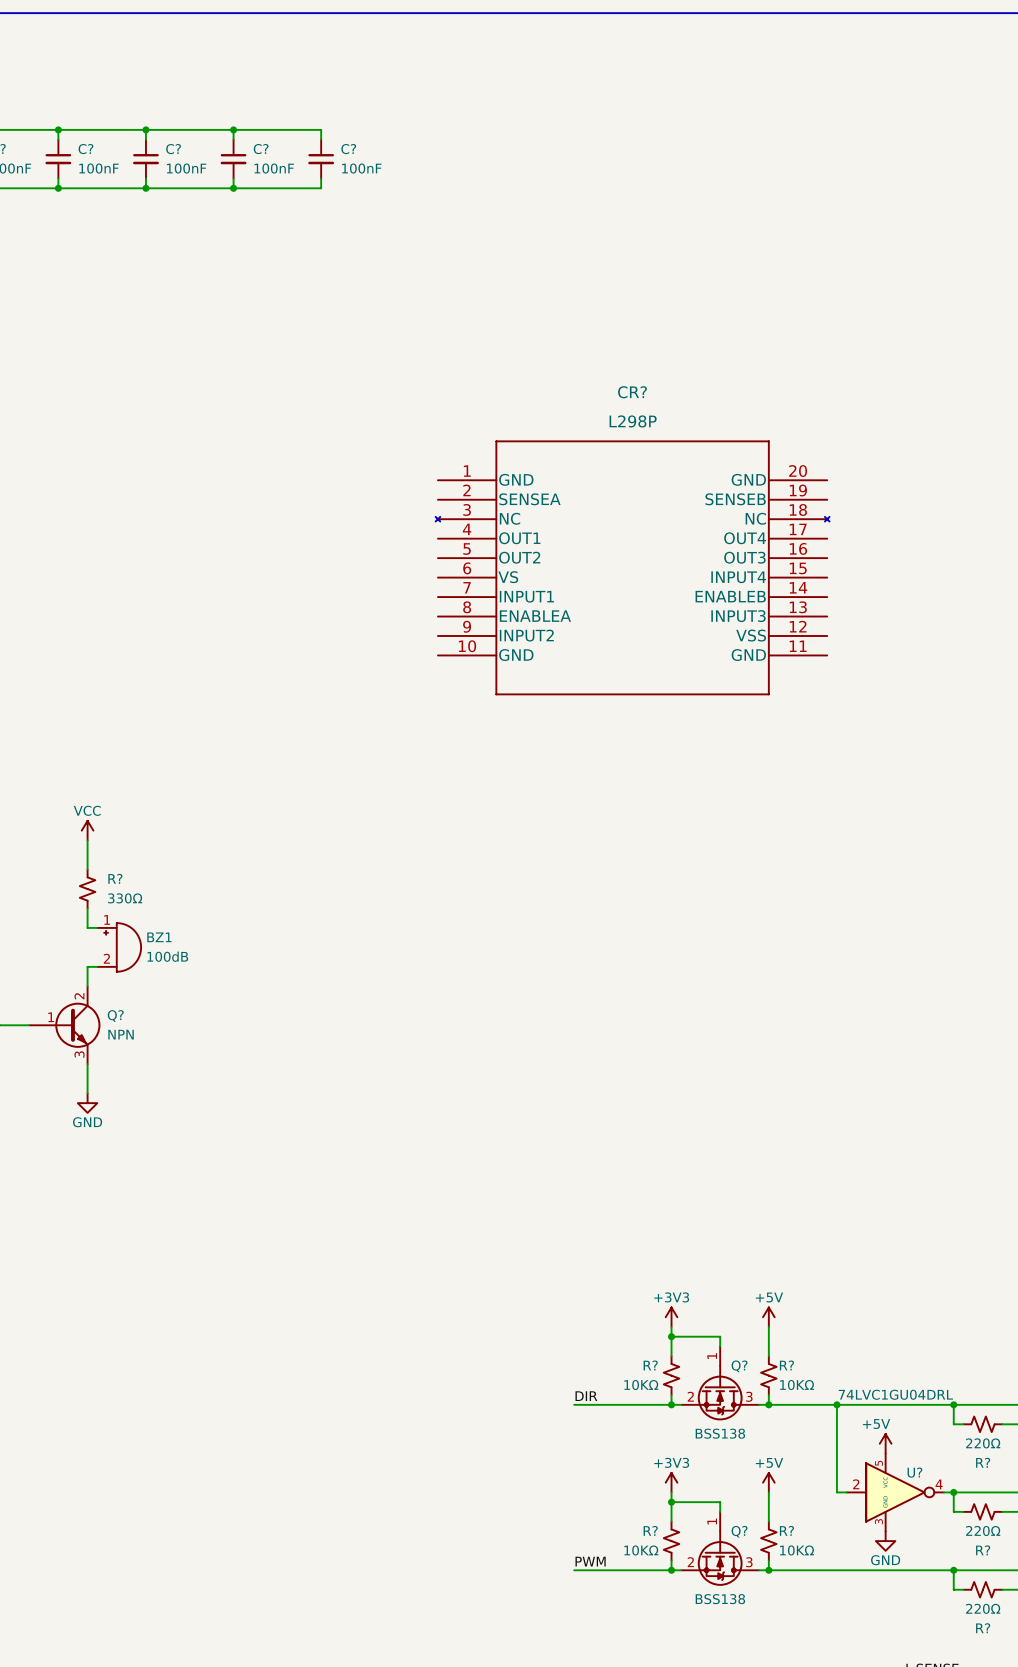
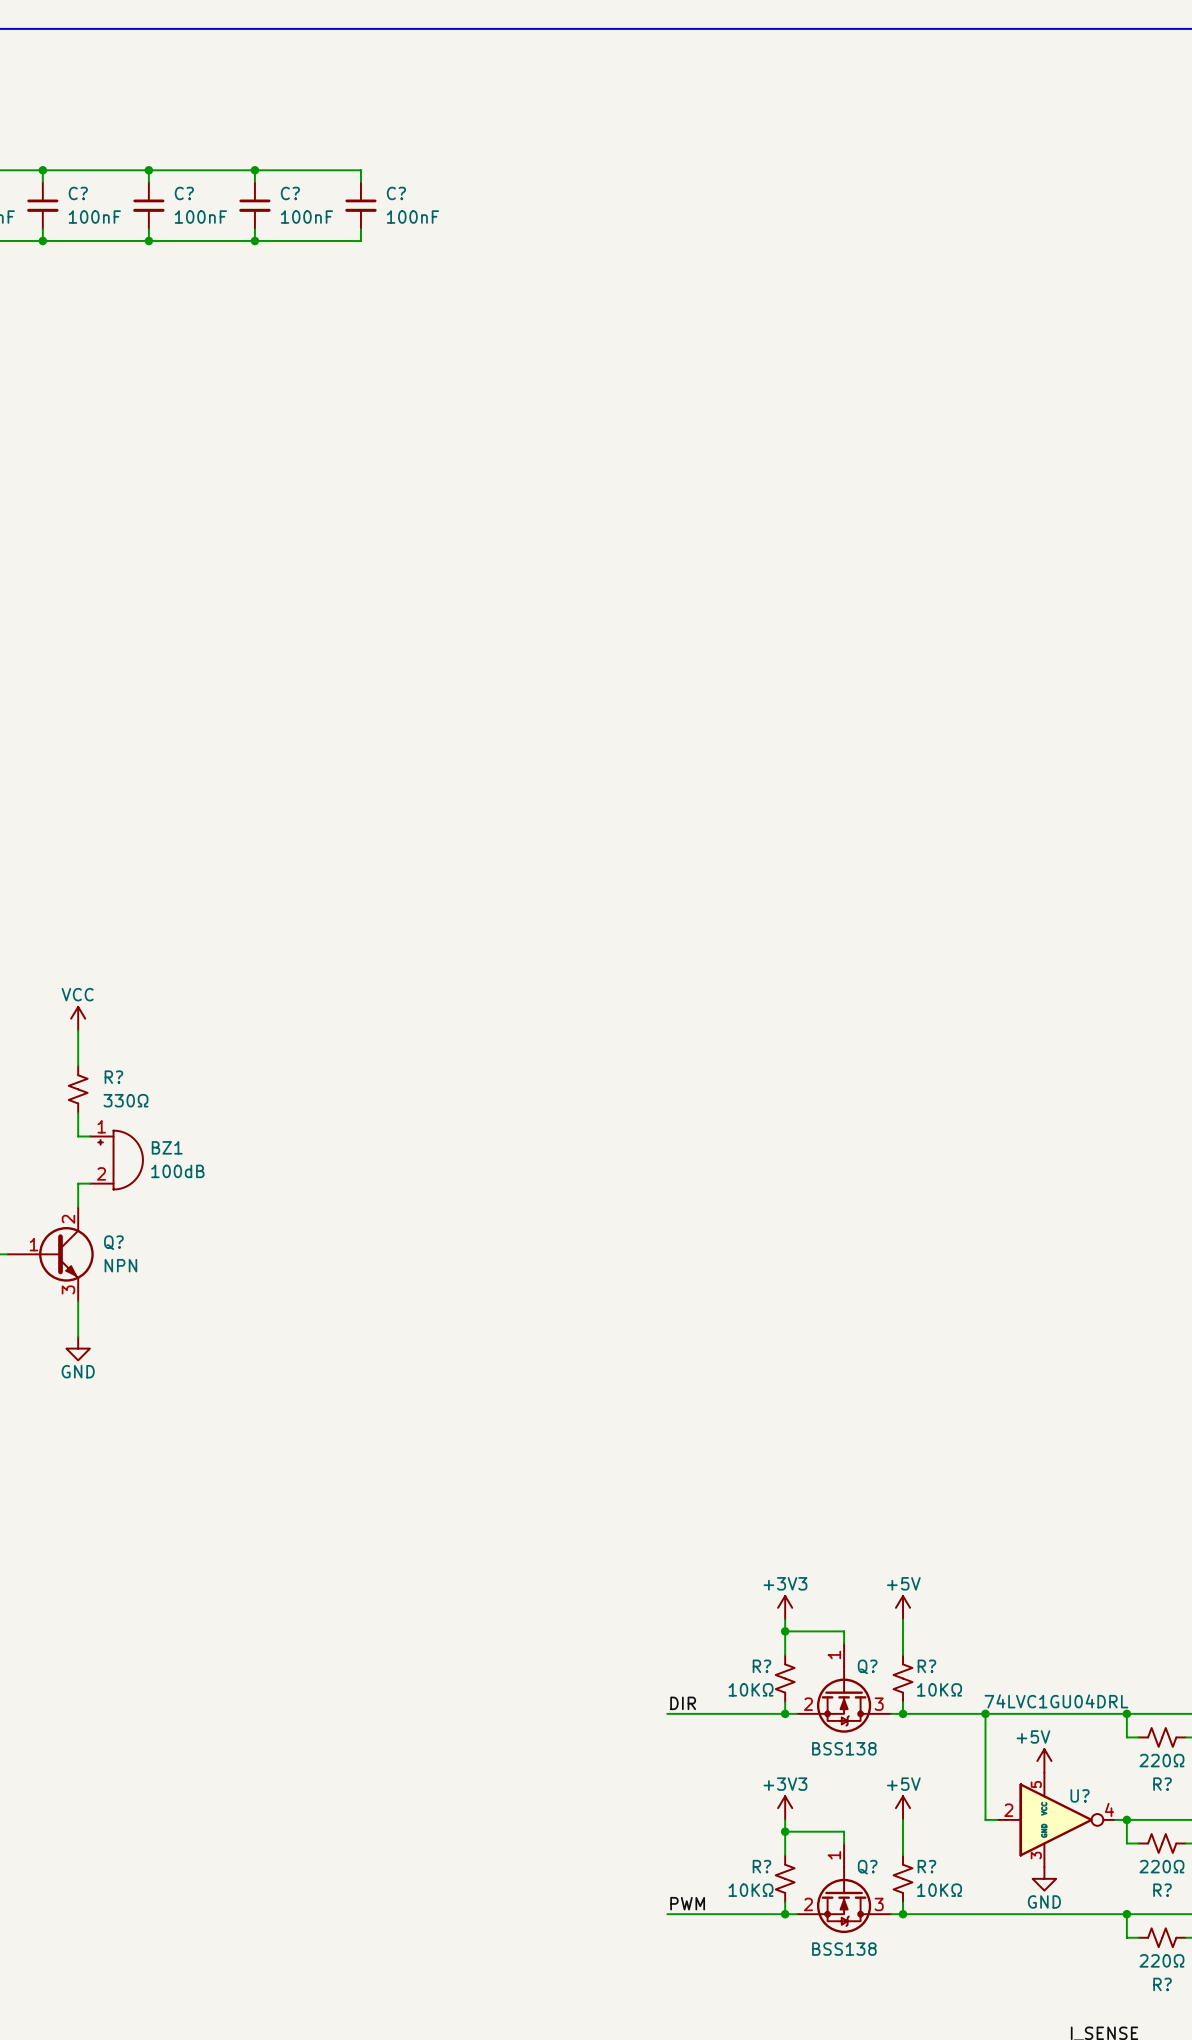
CR?: L298P (632, 567) -> none

